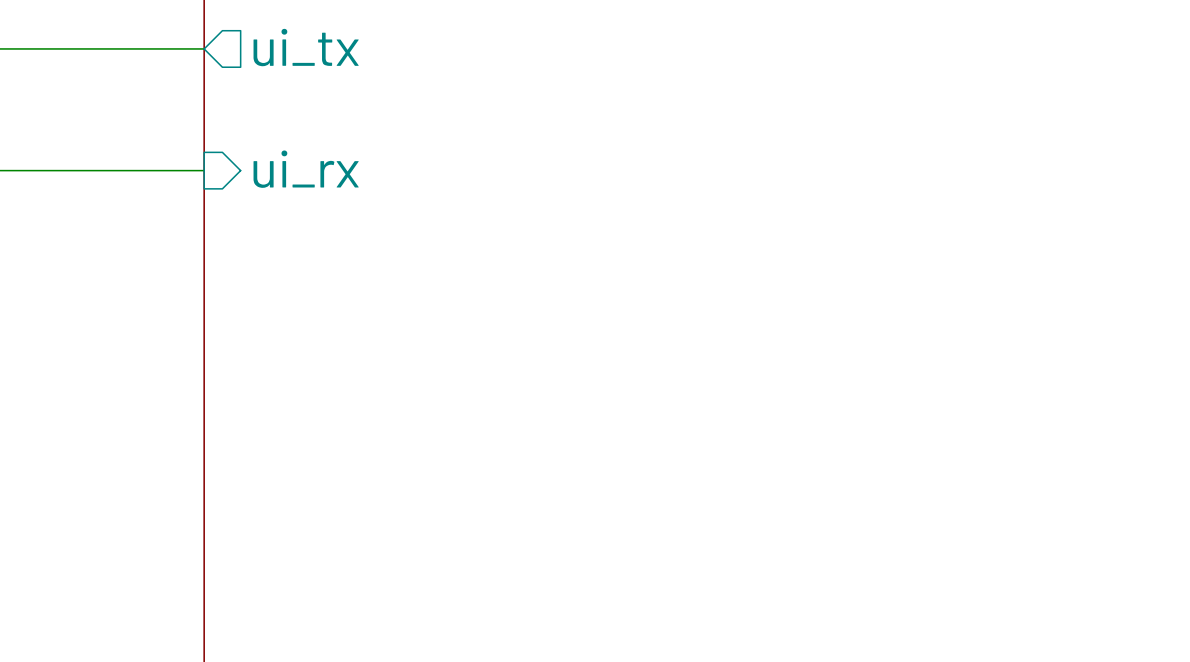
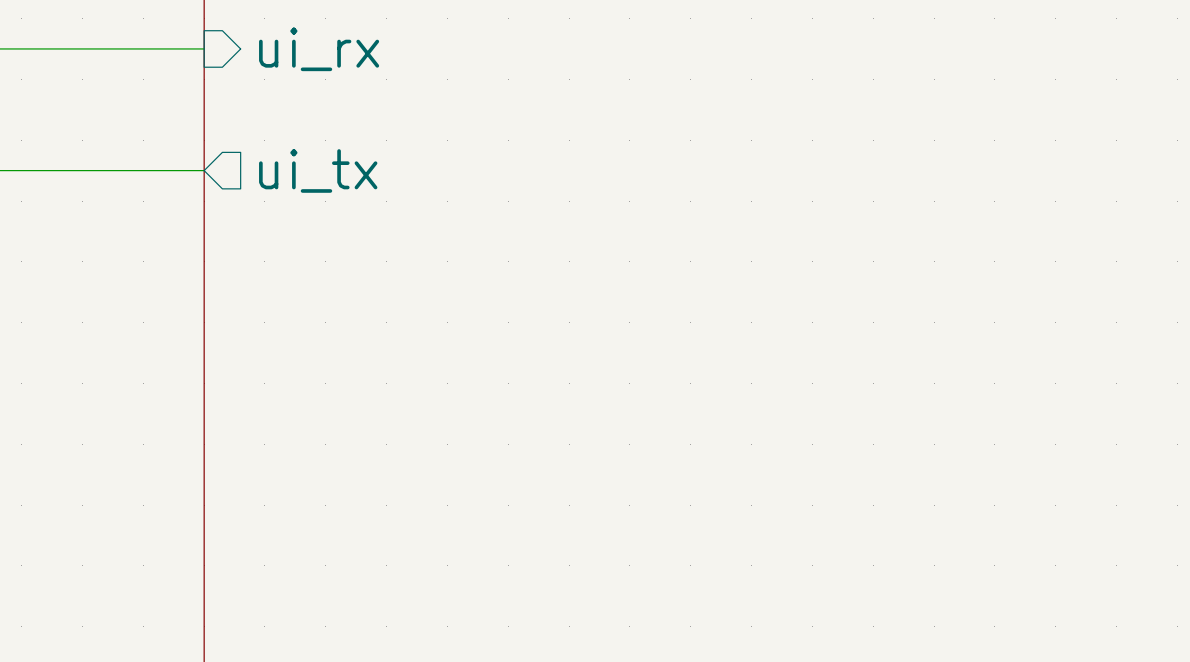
sheet pin shape: output (306, 47) -> input (319, 49)
sheet pin: ui_tx (306, 47) -> ui_rx (319, 49)
sheet pin shape: input (306, 169) -> output (318, 170)
sheet pin: ui_rx (306, 169) -> ui_tx (318, 170)

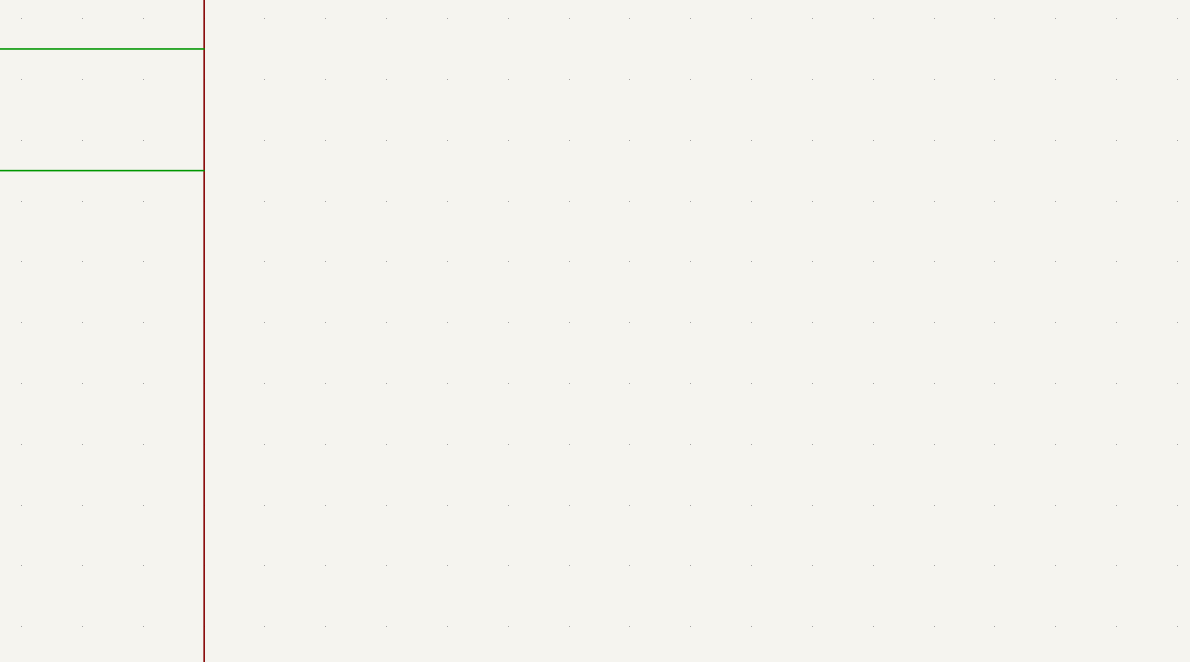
sheet pin: ui_rx (319, 49) -> none
sheet pin: ui_tx (318, 170) -> none

